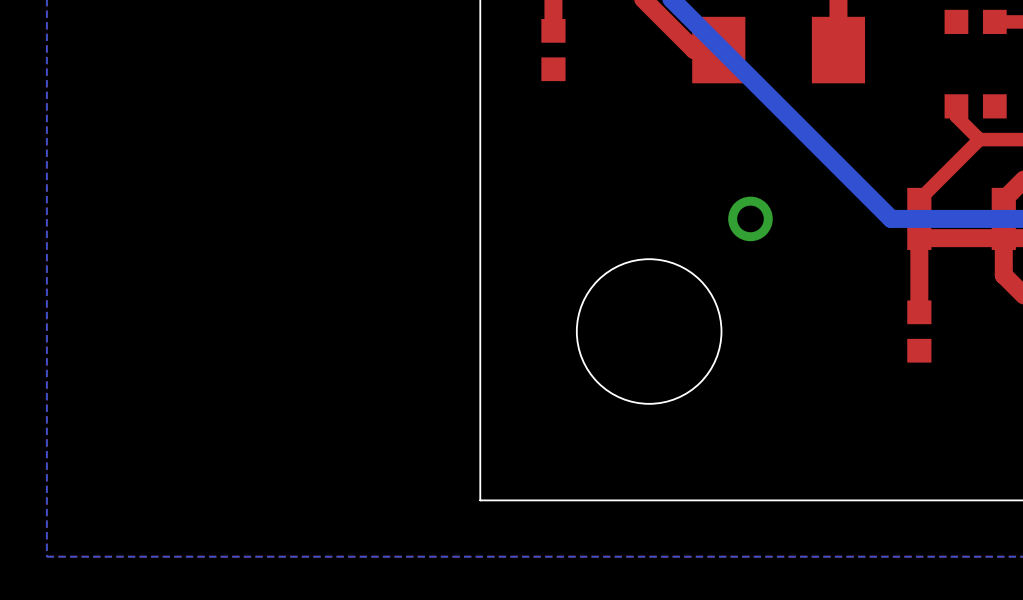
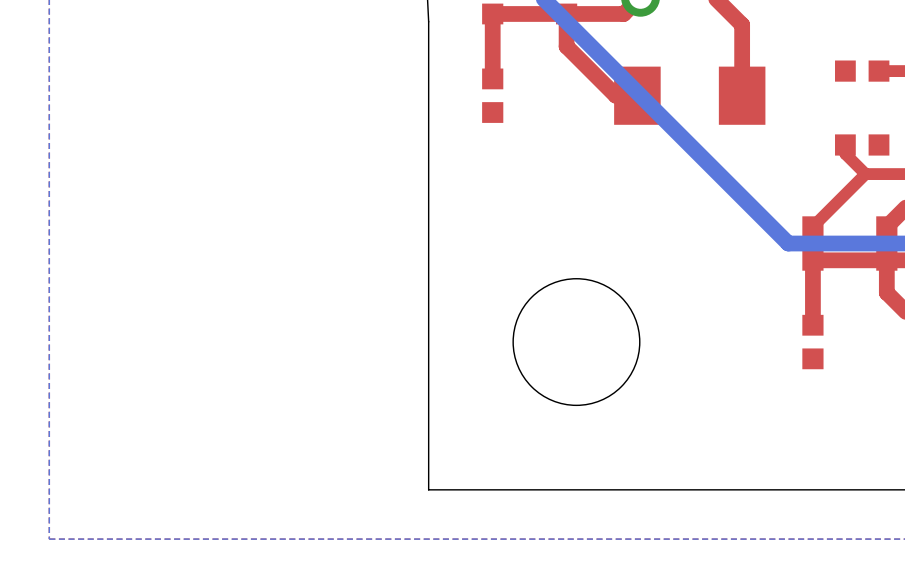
via: (750, 218) -> none

